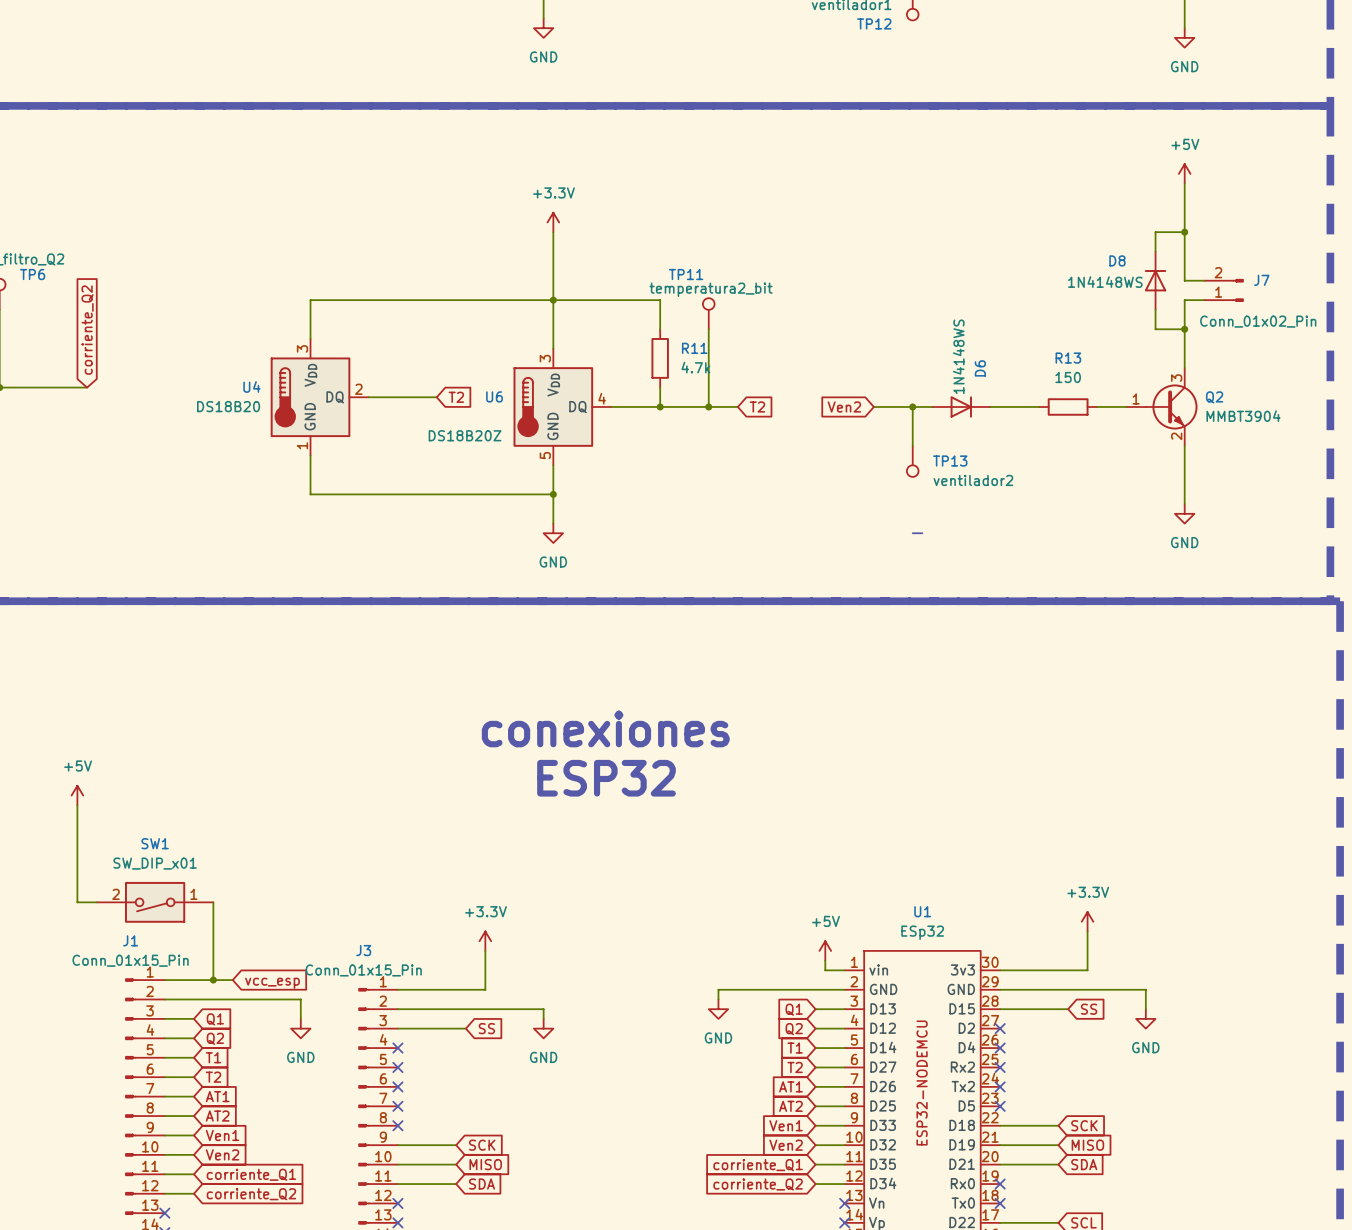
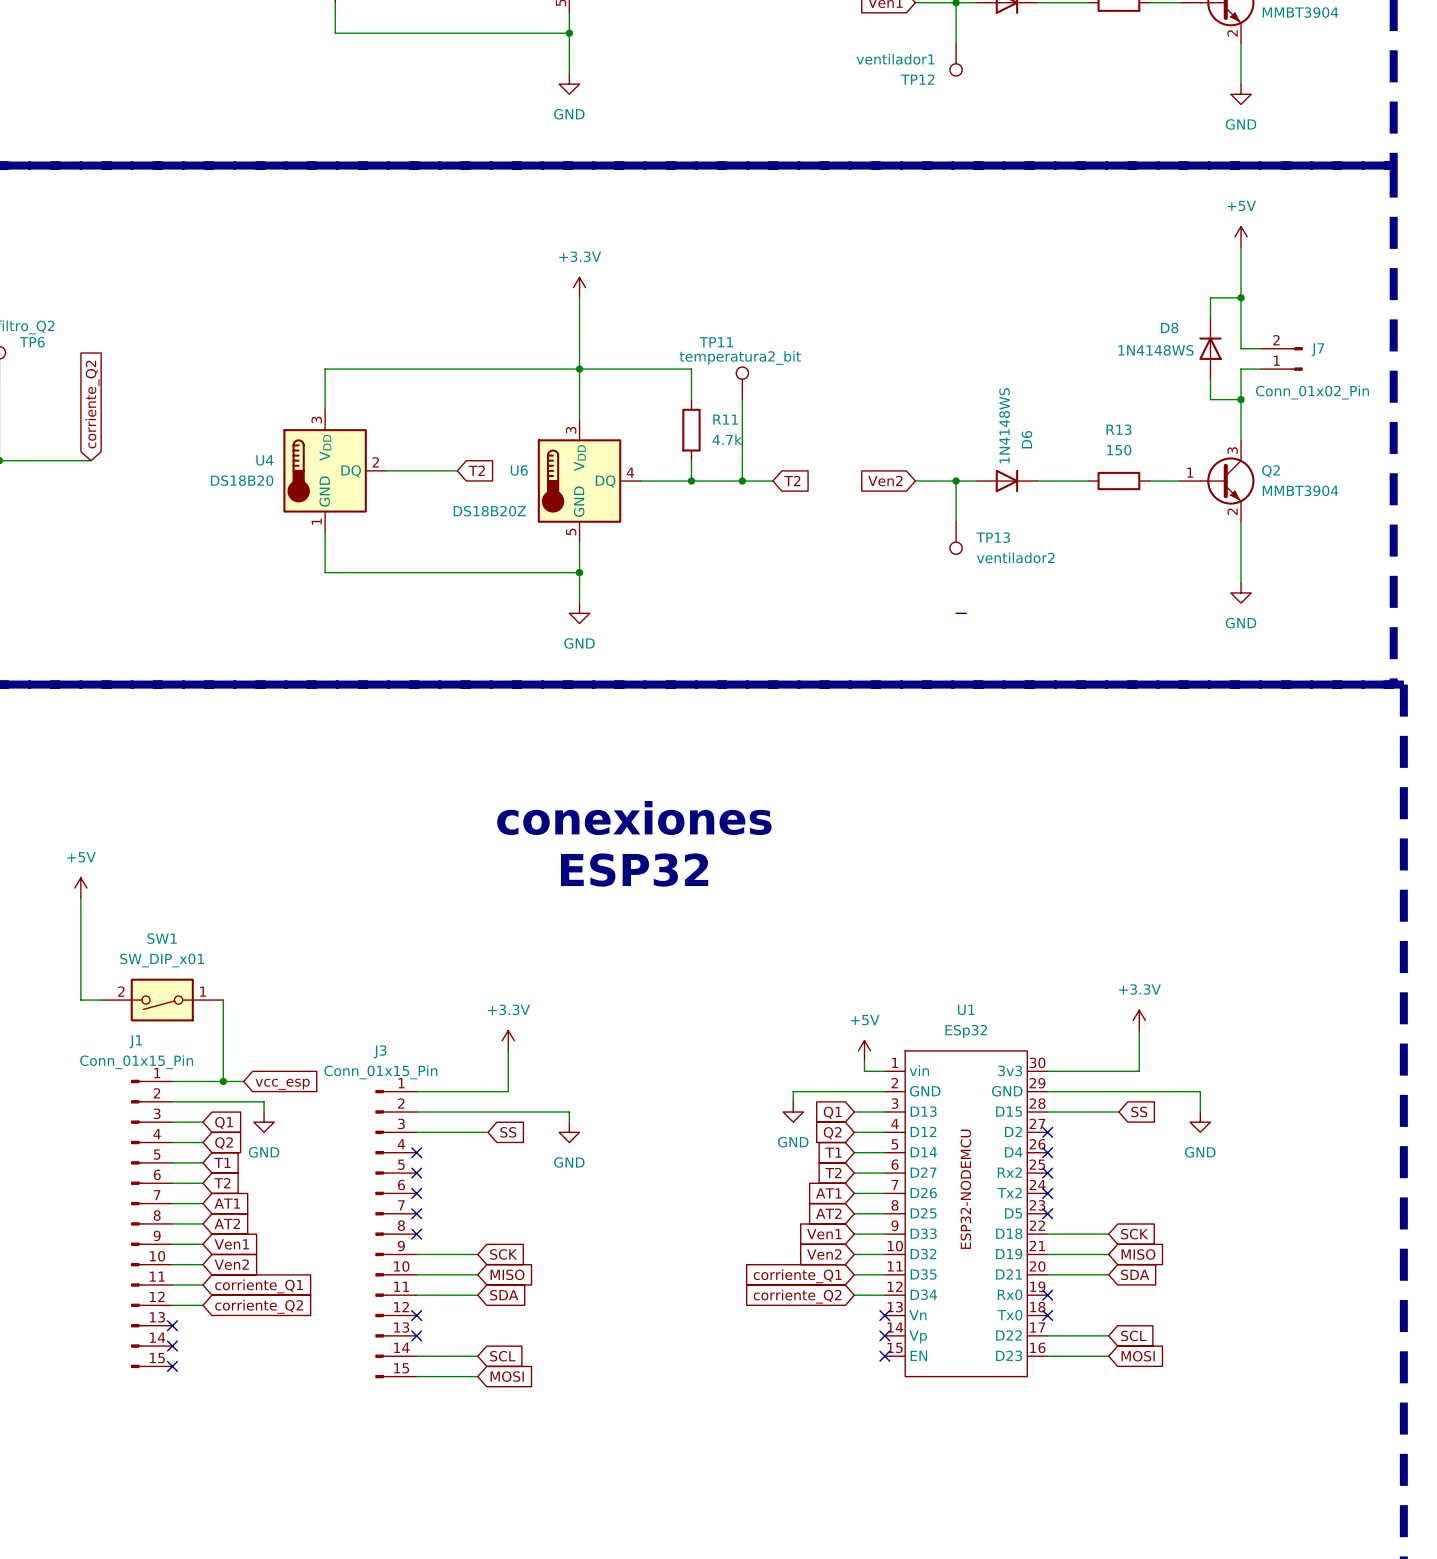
wire: (757, 989) (718, 989) (718, 999) -> (793, 1091) (793, 1101)
wire: (252, 999) (300, 999) (300, 1018) -> (264, 1101) (264, 1112)
power symbol position: GND (718, 1009) -> GND (793, 1112)
power symbol position: GND (300, 1028) -> GND (264, 1122)

